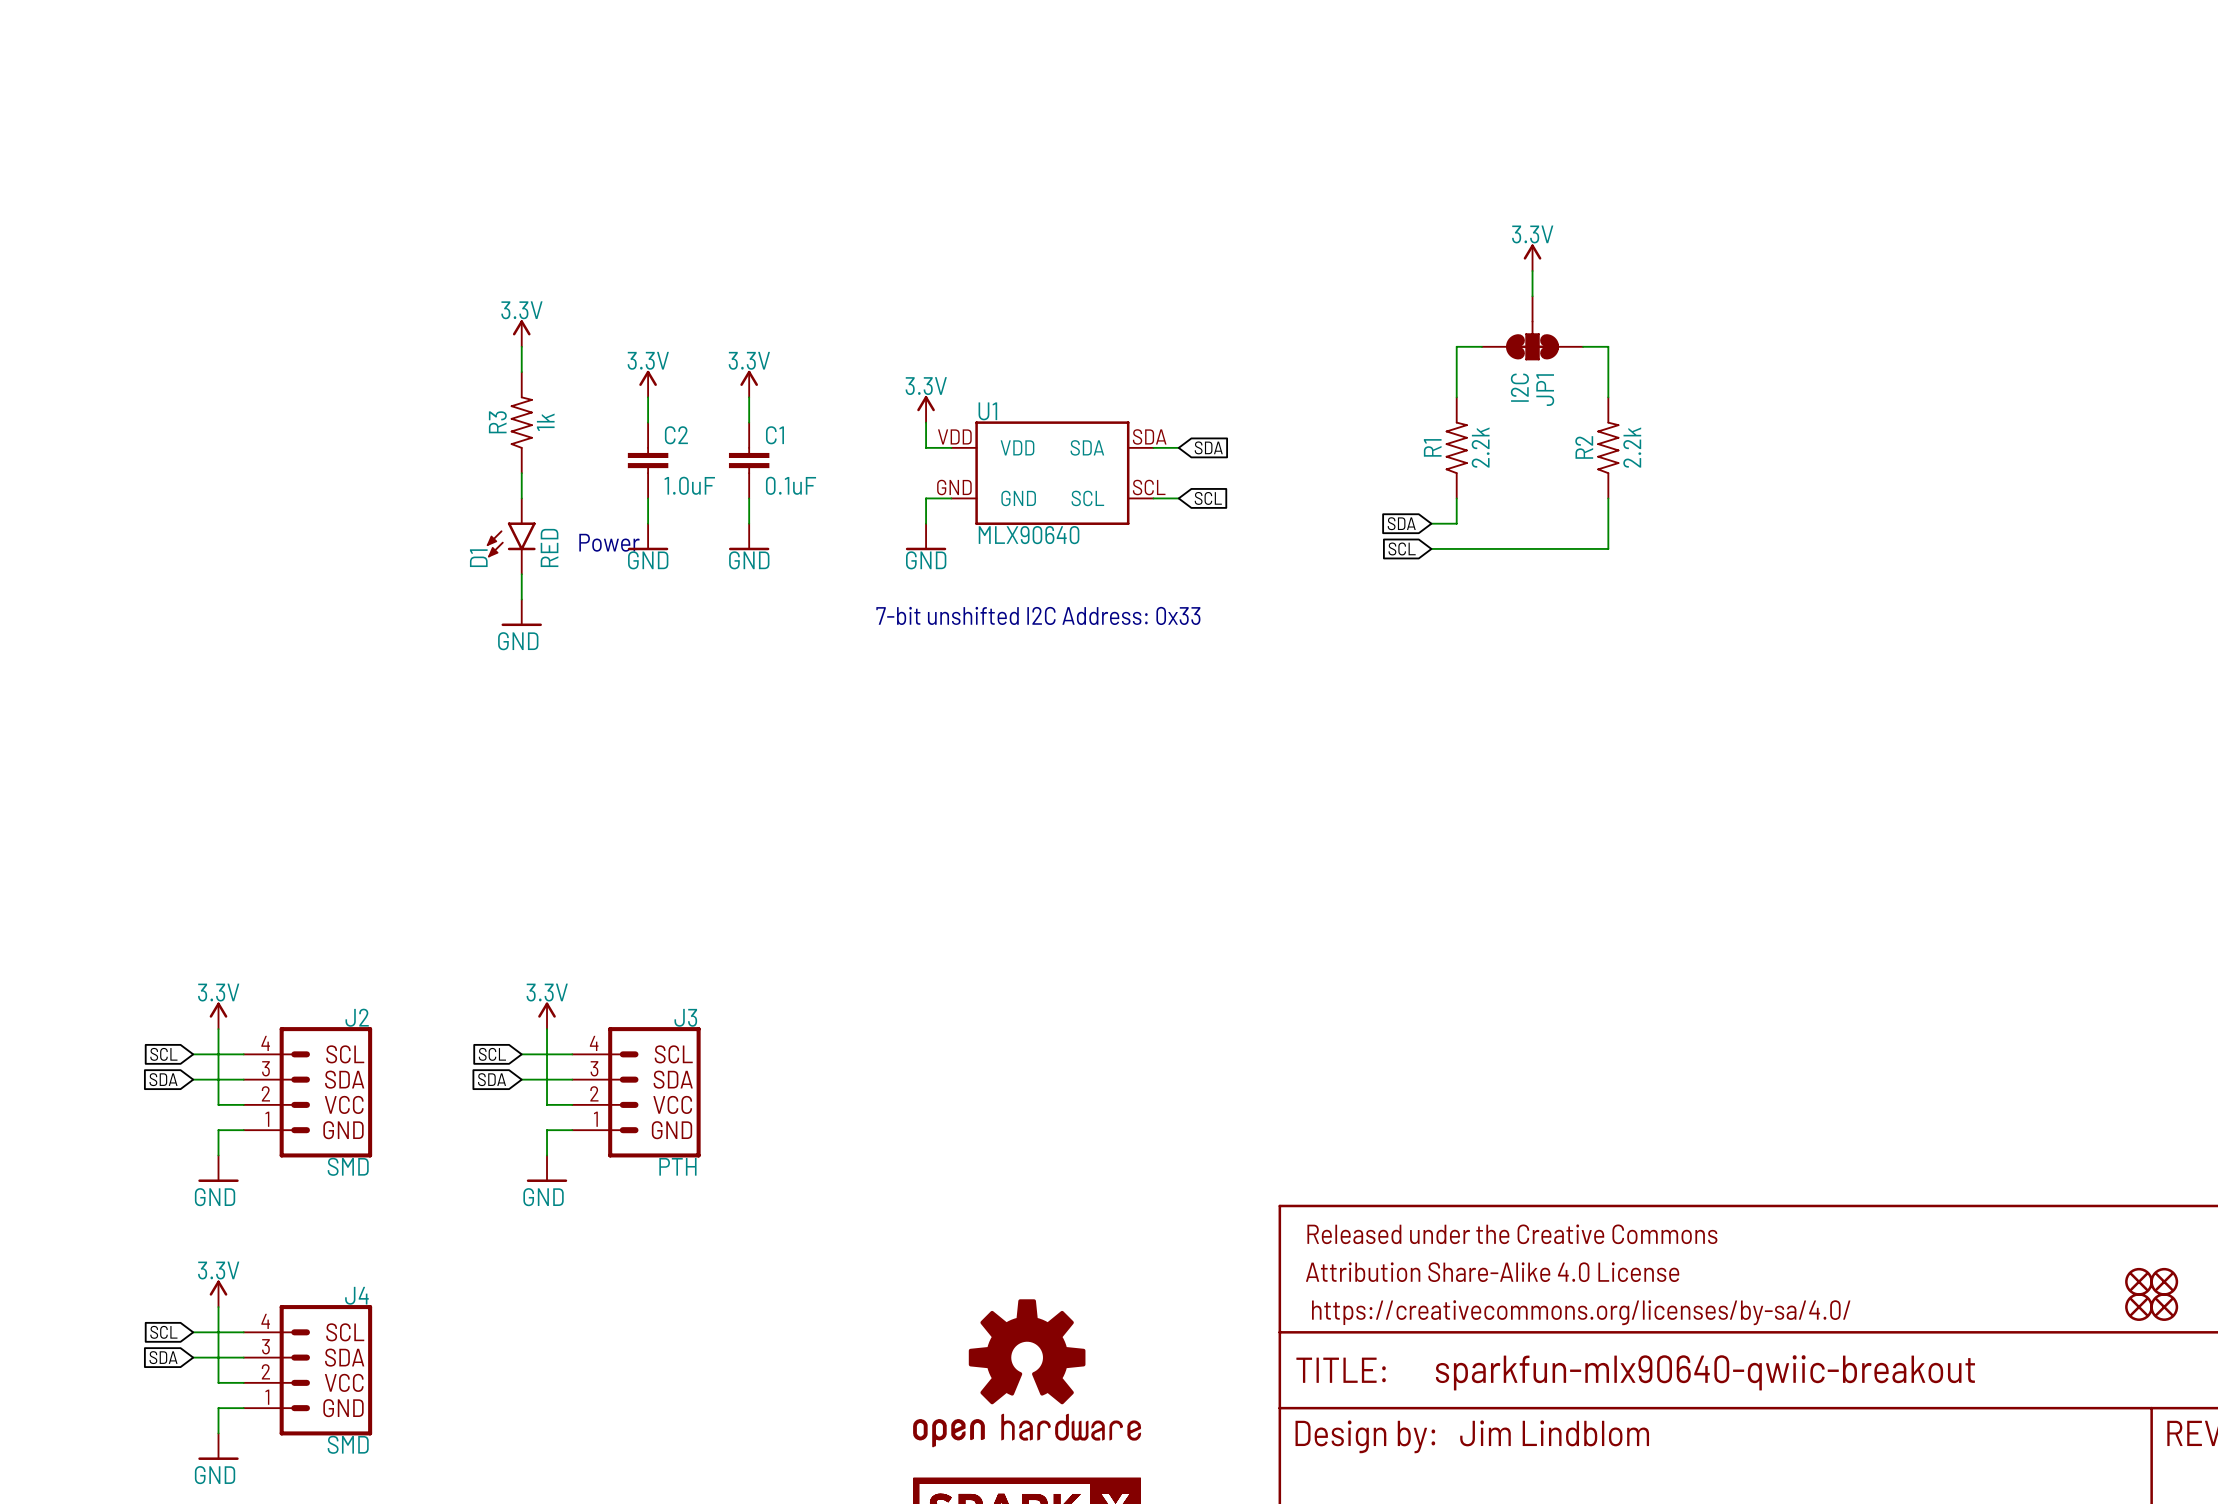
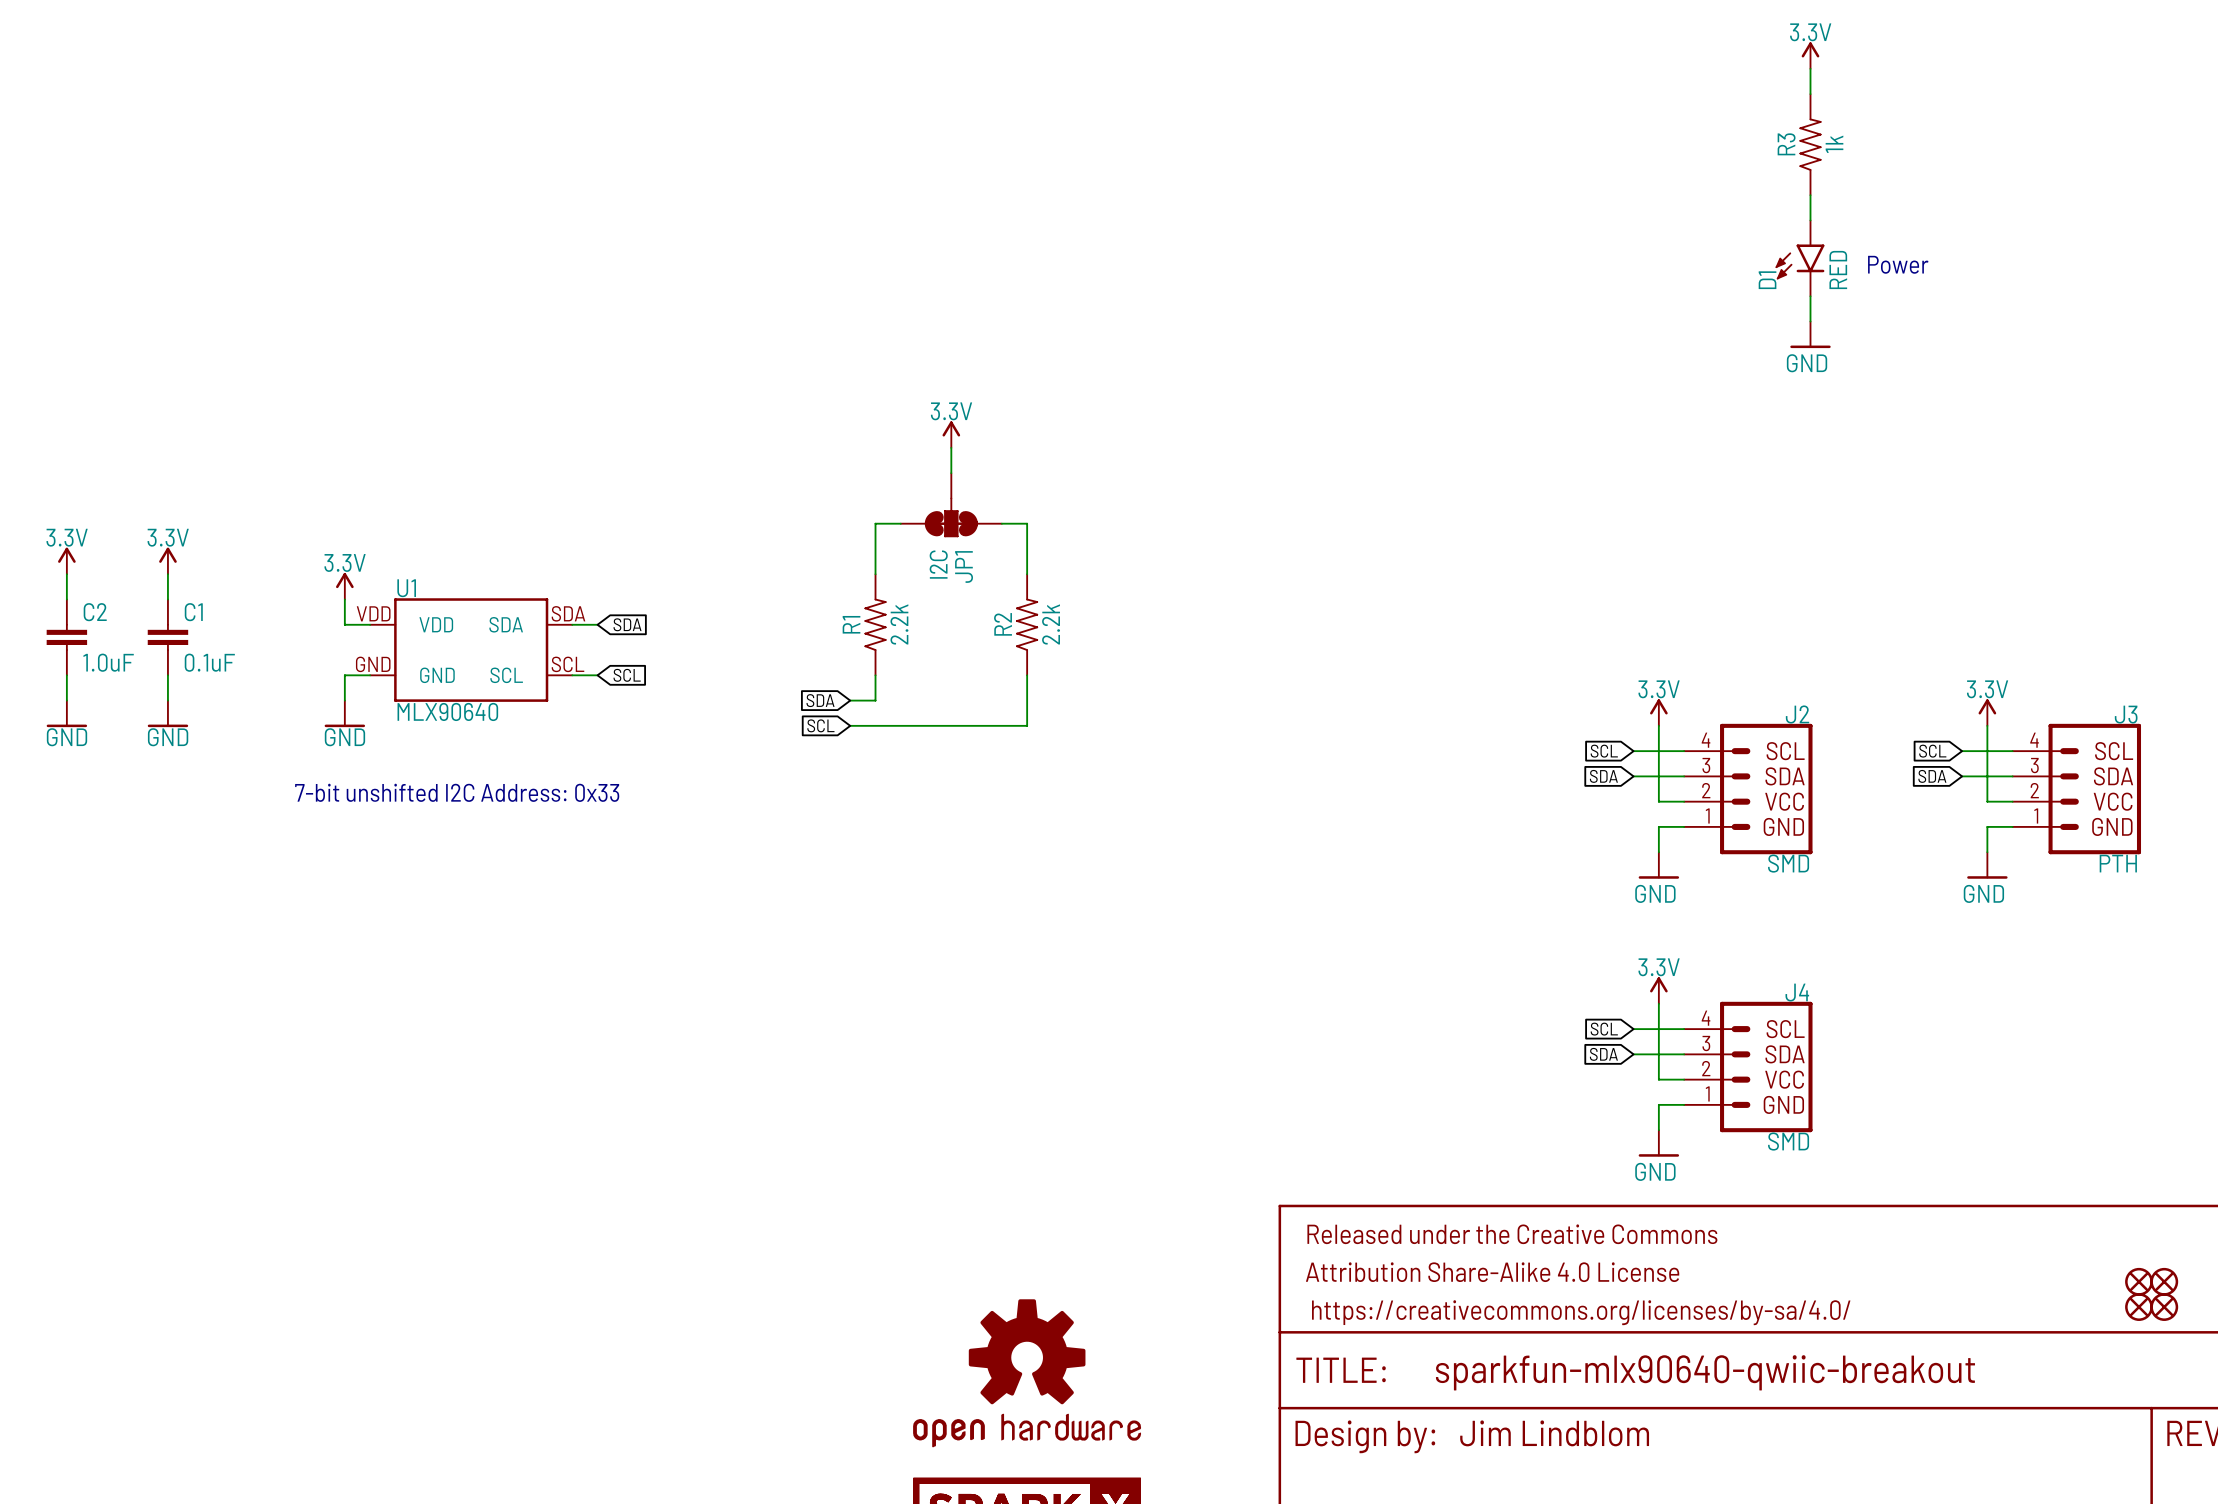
power symbol: none -> 3.3V (1810, 55)
wire: none -> (1810, 68) (1810, 94)
wire: none -> (1810, 195) (1810, 220)
power symbol: 3.3V (1532, 257) -> none
text: none -> Power (1898, 264)
wire: (1532, 271) (1532, 296) -> none
wire: none -> (1810, 296) (1810, 321)
JP1 position: (1532, 328) -> (951, 505)
power symbol: 3.3V (521, 333) -> none
power symbol: none -> GND (1810, 334)
wire: (521, 346) (521, 372) -> none
wire: (1481, 346) (1456, 346) (1456, 397) -> none
wire: (1583, 346) (1608, 346) (1608, 397) -> none
power symbol: 3.3V (648, 384) -> none
power symbol: 3.3V (749, 384) -> none
wire: (648, 397) (648, 422) -> none
wire: (749, 397) (749, 422) -> none
power symbol position: 3.3V (926, 409) -> 3.3V (951, 434)
R3 position: (521, 422) -> (1810, 144)
wire: (926, 422) (926, 447) (951, 447) -> (951, 473) (951, 447)
wire: (1153, 447) (1178, 447) -> none
global label: SDA (1208, 447) -> none
R1 position: (1456, 447) -> (875, 624)
R2 position: (1608, 447) -> (1027, 624)
C2 position: (648, 460) -> (66, 637)
C1 position: (749, 460) -> (167, 637)
wire: (521, 473) (521, 498) -> none
U1 position: (1052, 473) -> (471, 650)
wire: (648, 498) (648, 523) -> none
wire: (749, 498) (749, 523) -> none
wire: (951, 498) (926, 498) (926, 523) -> none
wire: (1153, 498) (1178, 498) -> none
global label: SCL (1208, 498) -> none
wire: (1456, 498) (1456, 523) (1431, 523) -> none
wire: (1608, 498) (1608, 548) (1431, 548) -> none
wire: none -> (900, 523) (875, 523) (875, 574)
wire: none -> (1001, 523) (1027, 523) (1027, 574)
global label: SDA (1401, 523) -> none
D1 position: (511, 536) -> (1800, 258)
power symbol: GND (648, 536) -> none
power symbol: GND (749, 536) -> none
power symbol: GND (926, 536) -> none
text: Power (609, 542) -> none
global label: SCL (1402, 548) -> none
power symbol: none -> 3.3V (66, 560)
power symbol: none -> 3.3V (167, 560)
wire: none -> (66, 574) (66, 599)
wire: none -> (167, 574) (167, 599)
wire: (521, 574) (521, 599) -> none
power symbol: none -> 3.3V (344, 586)
wire: none -> (344, 599) (344, 624) (370, 624)
power symbol: GND (521, 612) -> none
text: 7-bit unshifted I2C Address: 0x33 (1038, 615) -> none
wire: none -> (572, 624) (597, 624)
global label: none -> SDA (627, 624)
wire: none -> (66, 675) (66, 700)
wire: none -> (167, 675) (167, 700)
wire: none -> (370, 675) (344, 675) (344, 700)
wire: none -> (572, 675) (597, 675)
global label: none -> SCL (627, 675)
wire: none -> (875, 675) (875, 700) (850, 700)
wire: none -> (1027, 675) (1027, 725) (850, 725)
global label: none -> SDA (820, 700)
power symbol: none -> 3.3V (1658, 712)
power symbol: none -> 3.3V (1987, 712)
power symbol: none -> GND (66, 713)
power symbol: none -> GND (167, 713)
power symbol: none -> GND (344, 713)
global label: none -> SCL (820, 725)
wire: none -> (1658, 725) (1658, 801) (1684, 801)
wire: none -> (1987, 725) (1987, 801) (2012, 801)
global label: none -> SCL (1604, 751)
wire: none -> (1633, 751) (1684, 751)
global label: none -> SCL (1932, 751)
wire: none -> (1962, 751) (2012, 751)
global label: none -> SDA (1603, 776)
wire: none -> (1633, 776) (1684, 776)
global label: none -> SDA (1932, 776)
wire: none -> (1962, 776) (2012, 776)
text: none -> 7-bit unshifted I2C Address: 0x33 (457, 792)
wire: none -> (1684, 826) (1658, 826) (1658, 852)
wire: none -> (2012, 826) (1987, 826) (1987, 852)
power symbol: none -> GND (1658, 865)
power symbol: none -> GND (1987, 865)
power symbol: none -> 3.3V (1658, 990)
wire: none -> (1658, 1003) (1658, 1079) (1684, 1079)
power symbol: 3.3V (218, 1015) -> none
power symbol: 3.3V (547, 1015) -> none
wire: (218, 1029) (218, 1104) (243, 1104) -> none
wire: (547, 1029) (547, 1104) (572, 1104) -> none
global label: none -> SCL (1604, 1029)
wire: none -> (1633, 1029) (1684, 1029)
global label: SCL (163, 1054) -> none
wire: (193, 1054) (243, 1054) -> none
global label: SCL (492, 1054) -> none
wire: (521, 1054) (572, 1054) -> none
global label: none -> SDA (1603, 1054)
wire: none -> (1633, 1054) (1684, 1054)
global label: SDA (163, 1079) -> none
wire: (193, 1079) (243, 1079) -> none
global label: SDA (492, 1079) -> none
wire: (521, 1079) (572, 1079) -> none
J2 position: (307, 1092) -> (1748, 789)
J3 position: (636, 1092) -> (2076, 789)
wire: none -> (1684, 1104) (1658, 1104) (1658, 1130)
wire: (243, 1130) (218, 1130) (218, 1155) -> none
wire: (572, 1130) (547, 1130) (547, 1155) -> none
power symbol: none -> GND (1658, 1143)
power symbol: GND (218, 1168) -> none
power symbol: GND (547, 1168) -> none
power symbol: 3.3V (218, 1293) -> none
wire: (218, 1307) (218, 1382) (243, 1382) -> none
global label: SCL (163, 1332) -> none
wire: (193, 1332) (243, 1332) -> none
global label: SDA (163, 1357) -> none
wire: (193, 1357) (243, 1357) -> none
J4 position: (307, 1370) -> (1748, 1067)
wire: (243, 1408) (218, 1408) (218, 1433) -> none
power symbol: GND (218, 1446) -> none

